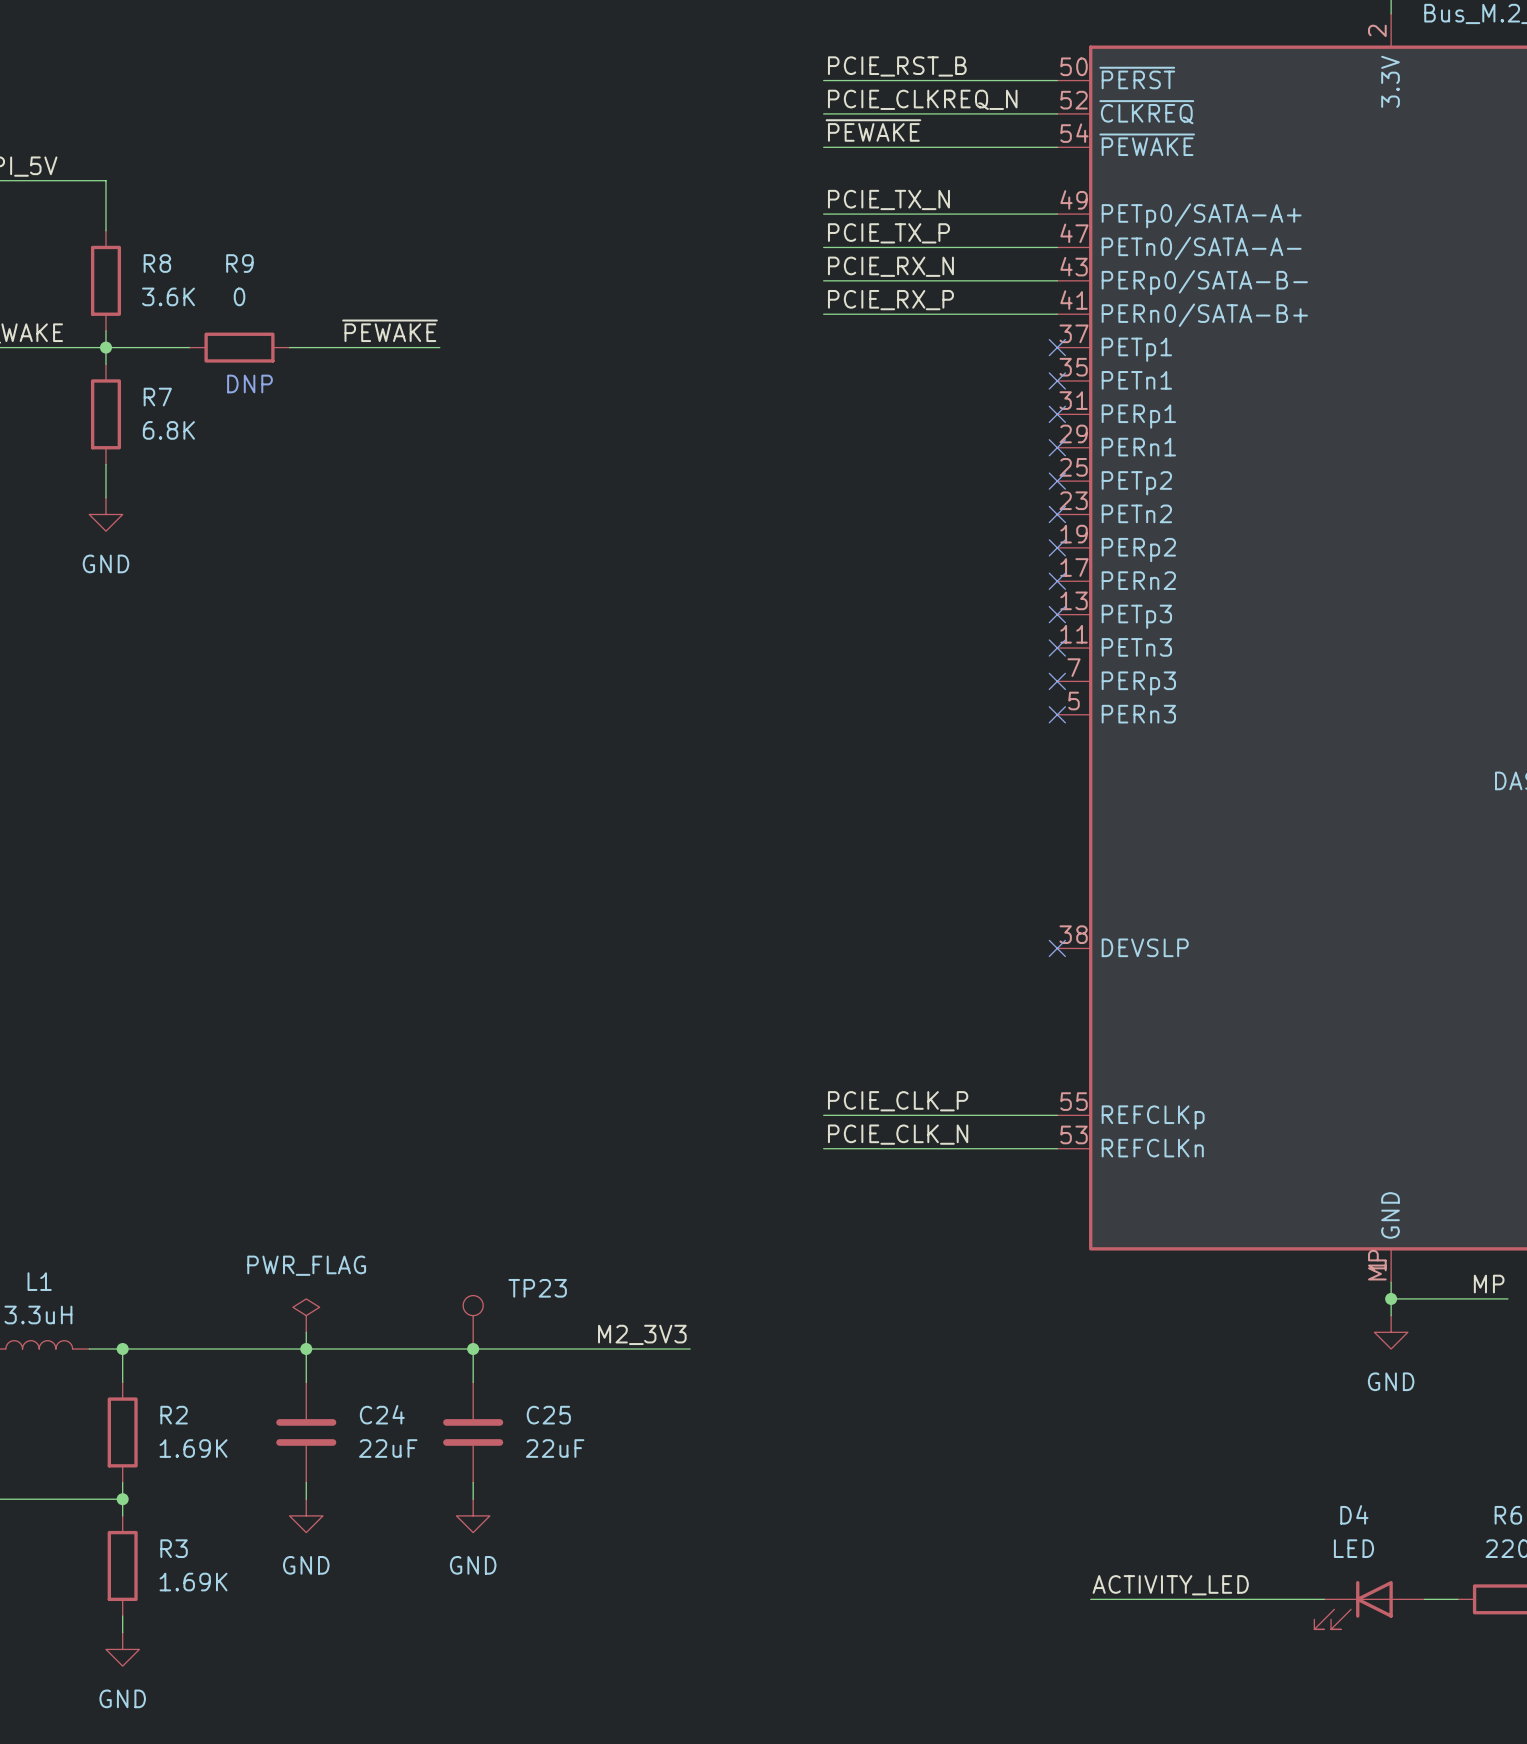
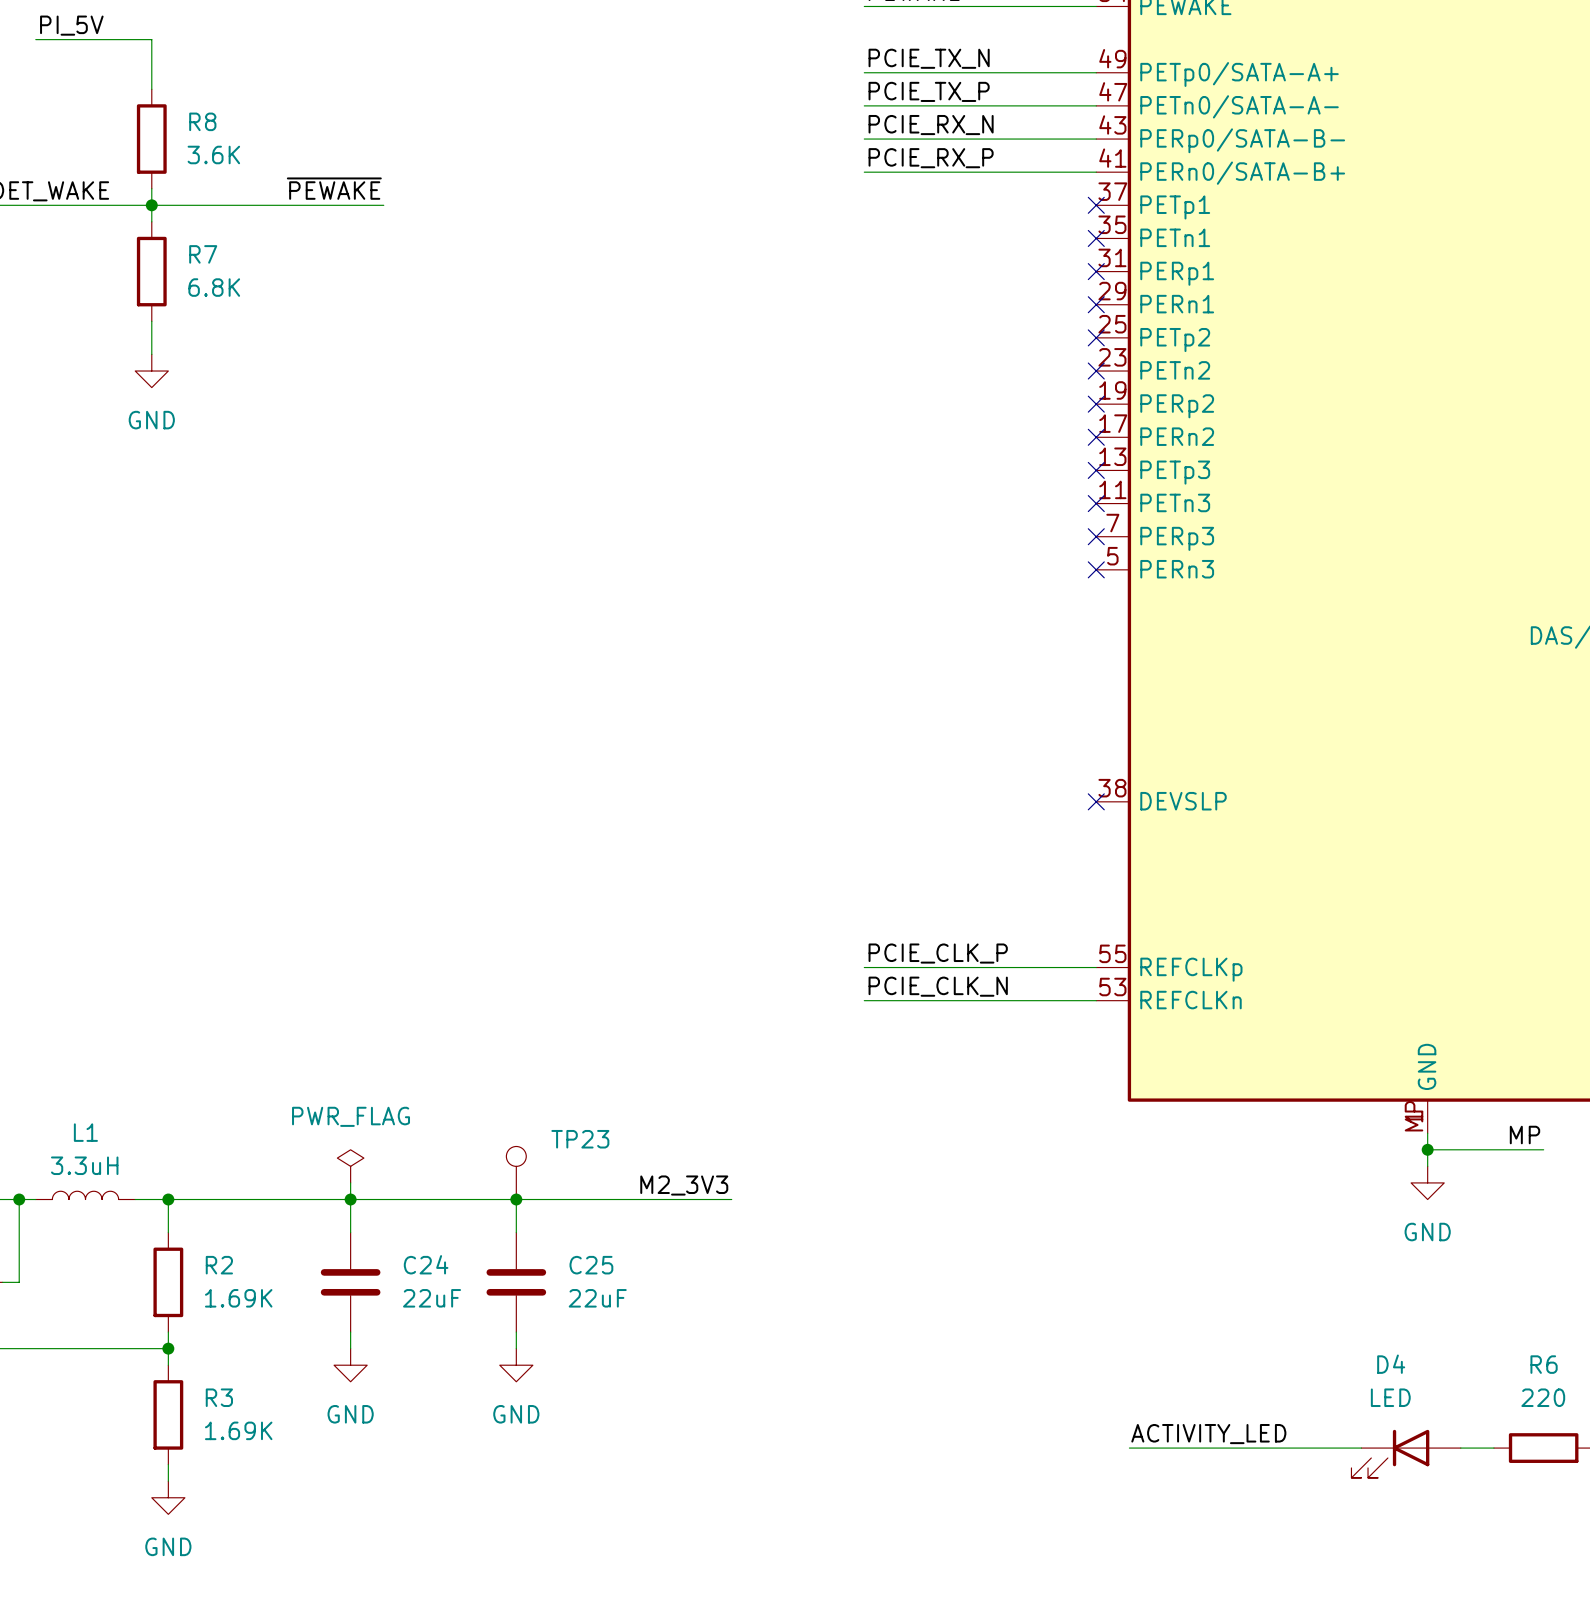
label position: ~{PEWAKE} (389, 330) -> ~{PEWAKE} (334, 188)
R9: 0 (239, 347) -> none
wire: (339, 347) (439, 347) -> (234, 205) (334, 205)
text: DNP (249, 383) -> none

